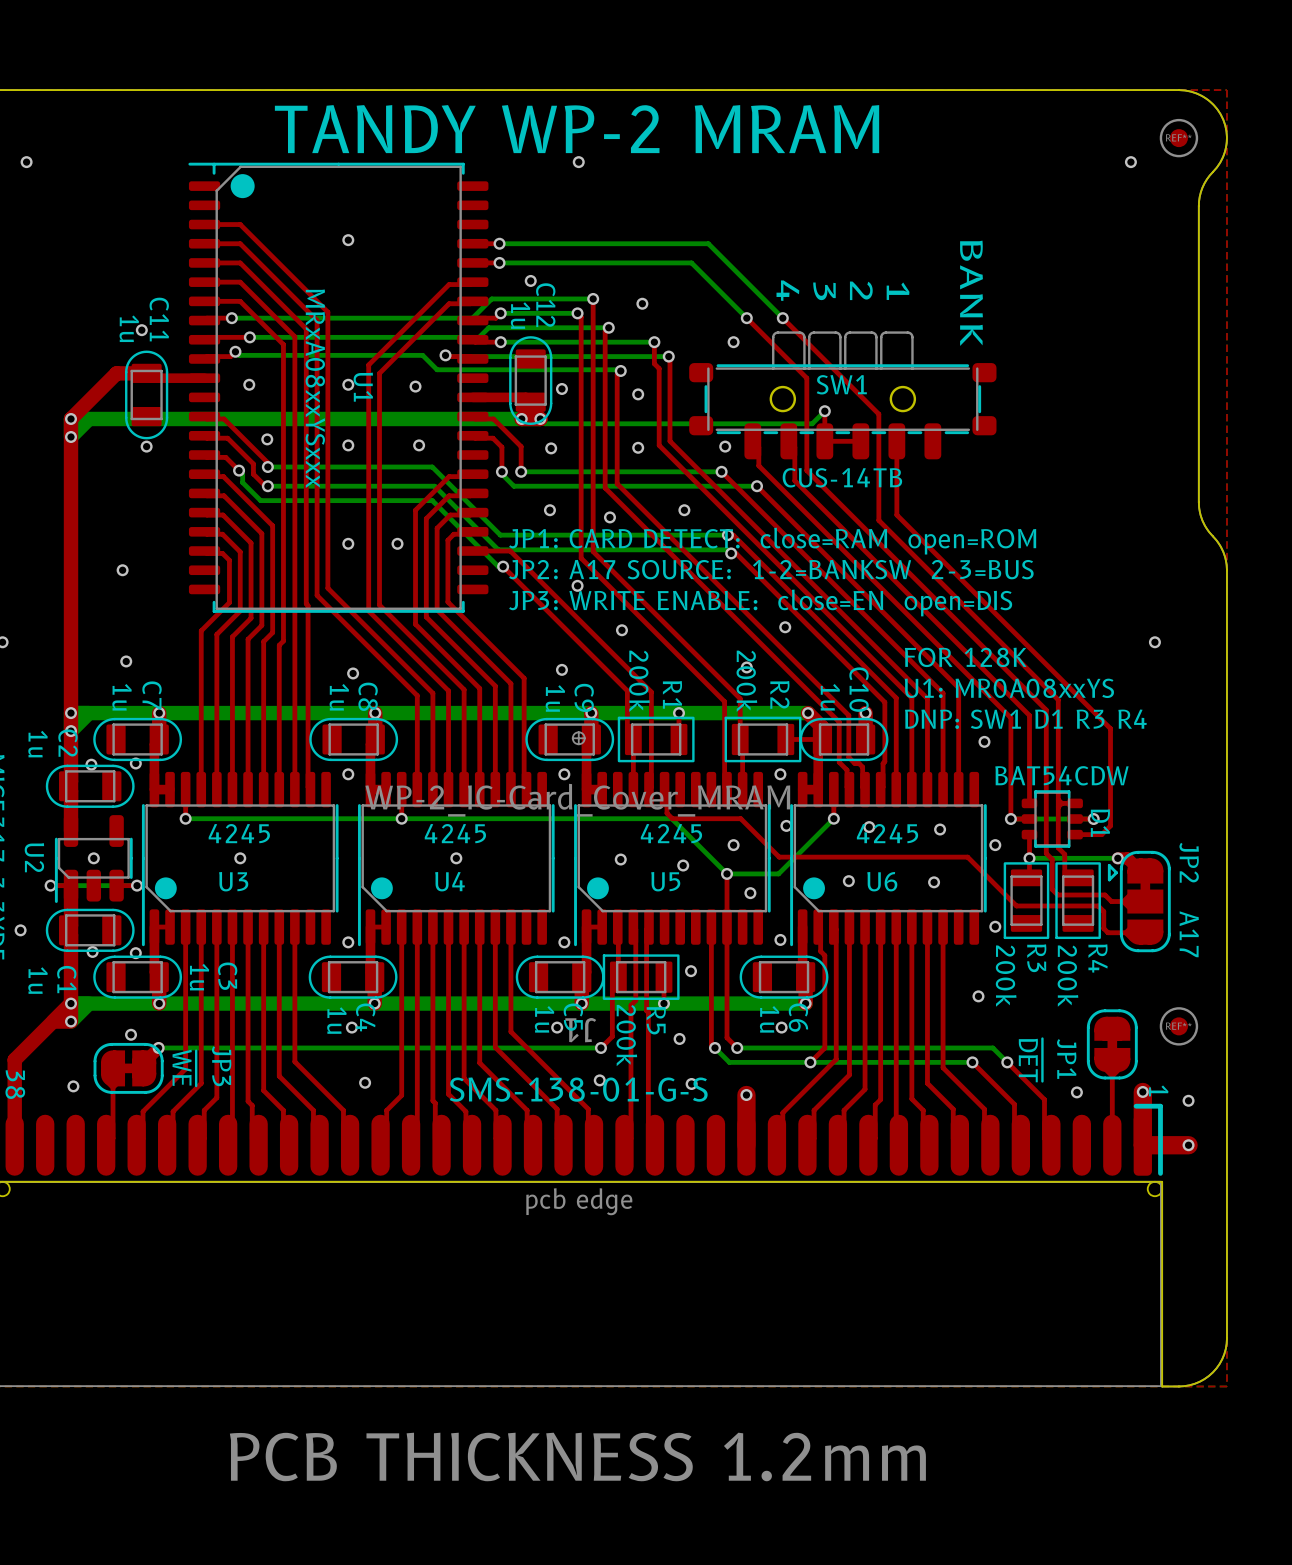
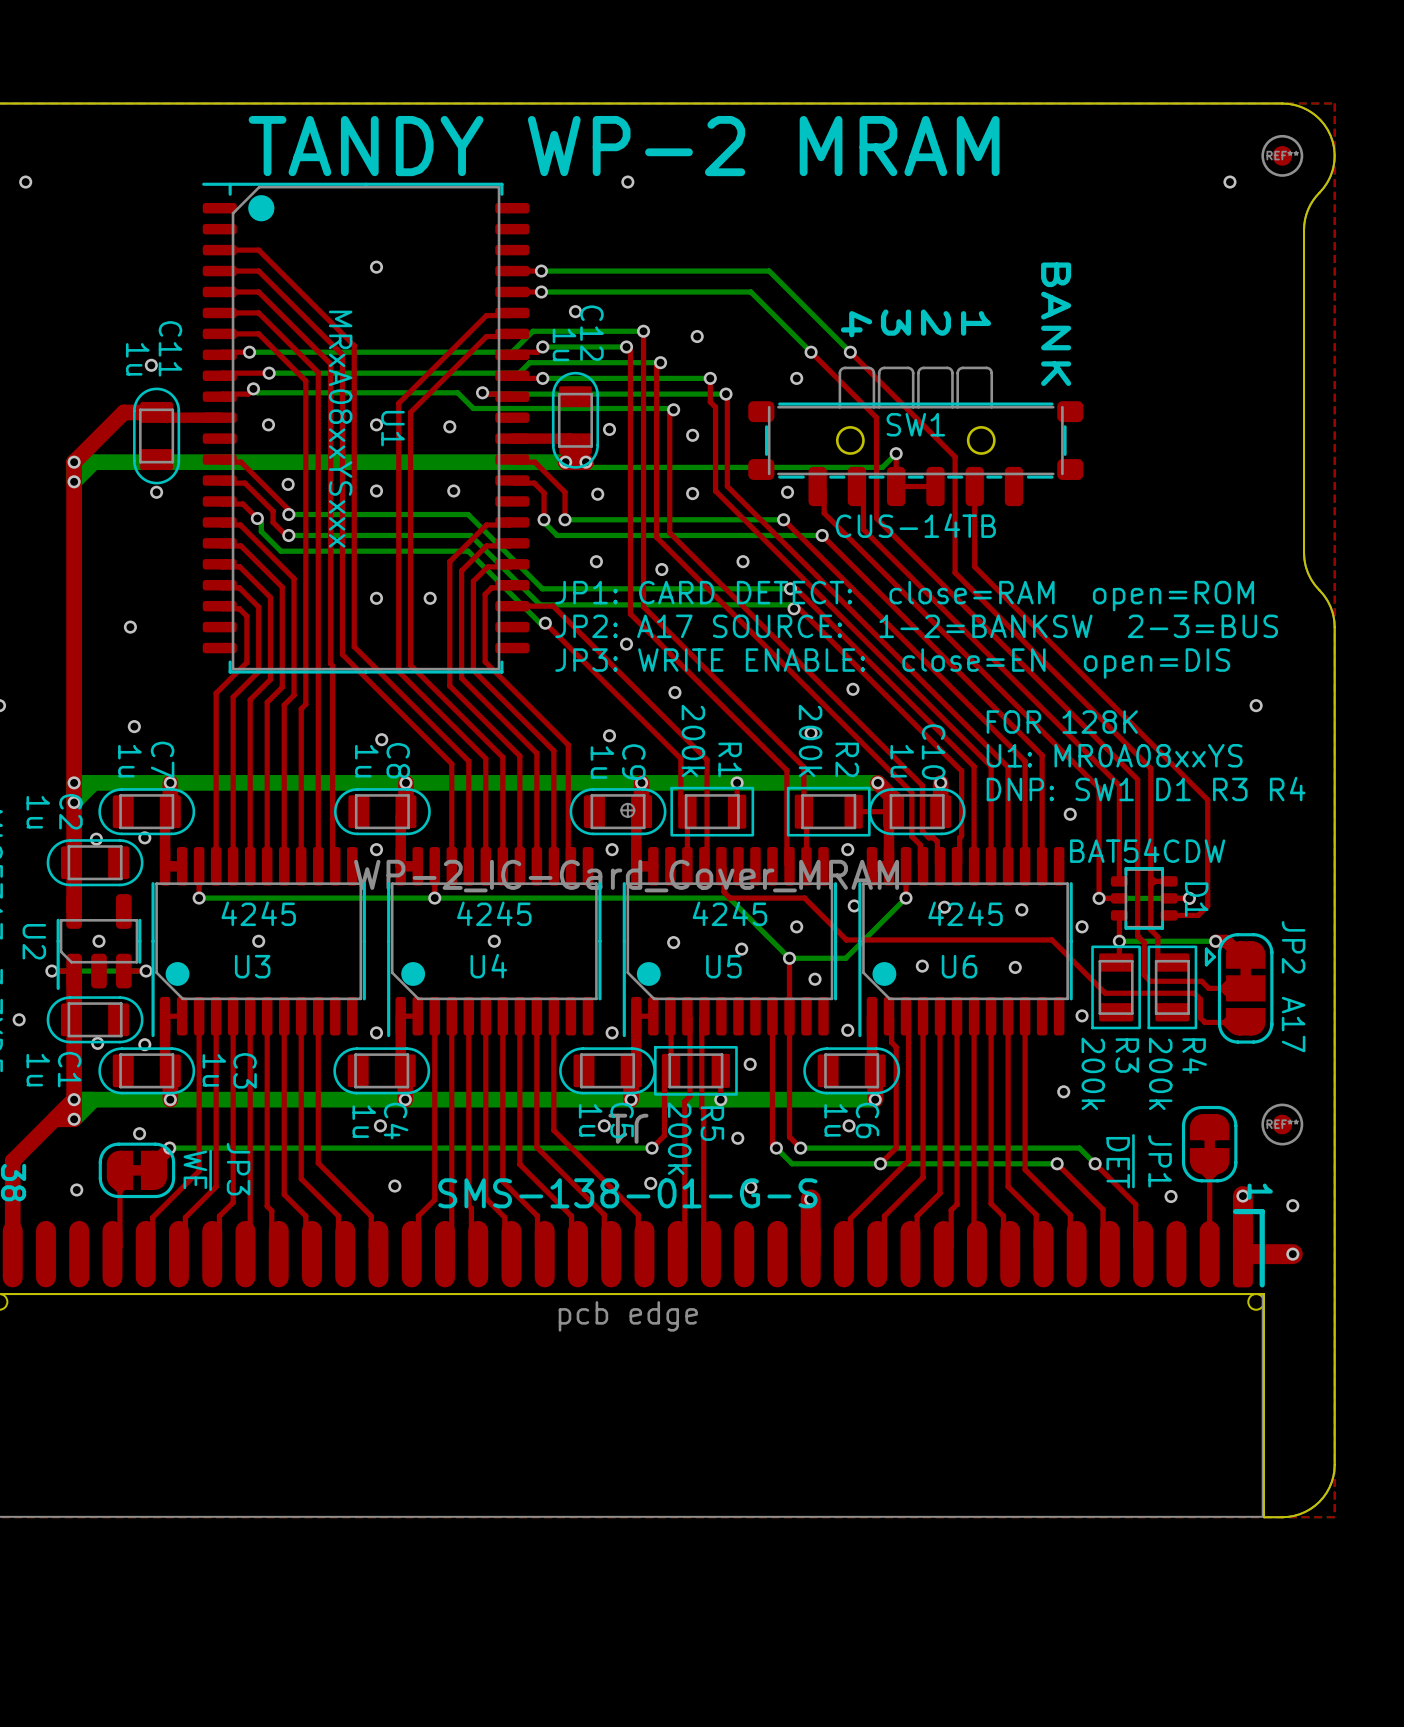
text: PCB THICKNESS 1.2mm (577, 1456) -> none

